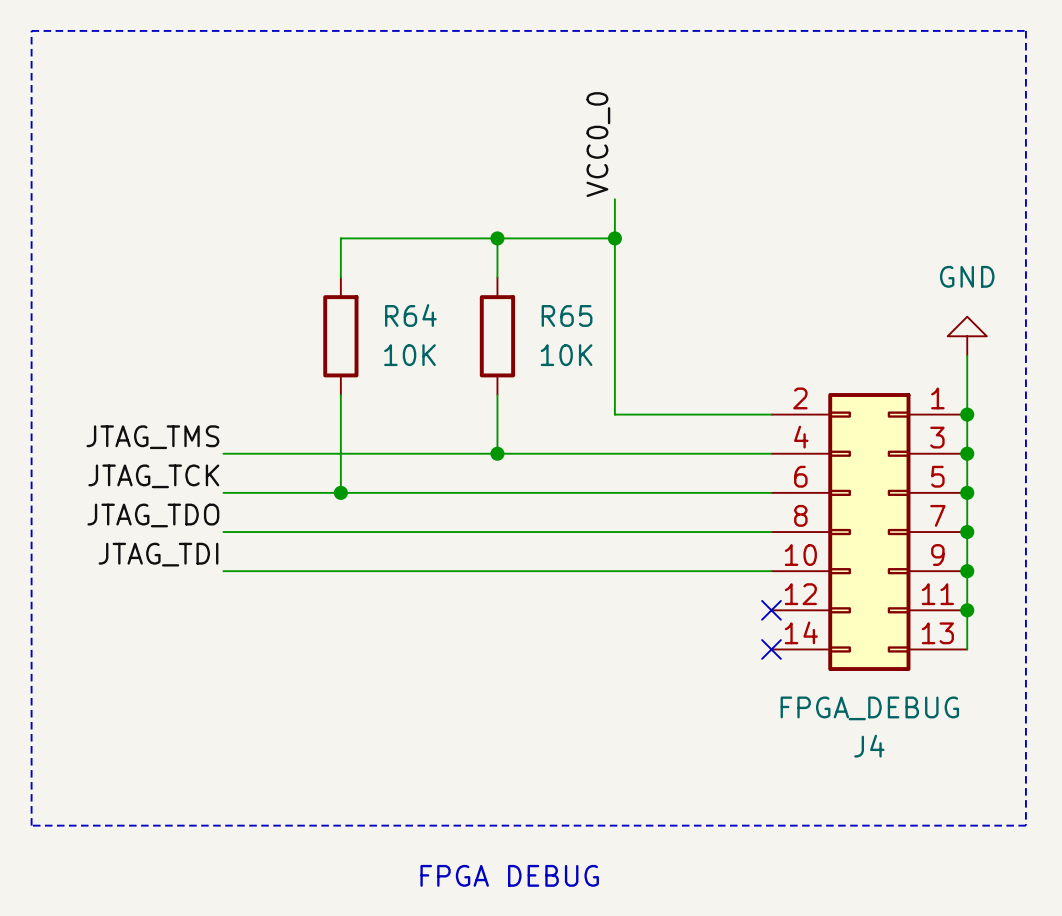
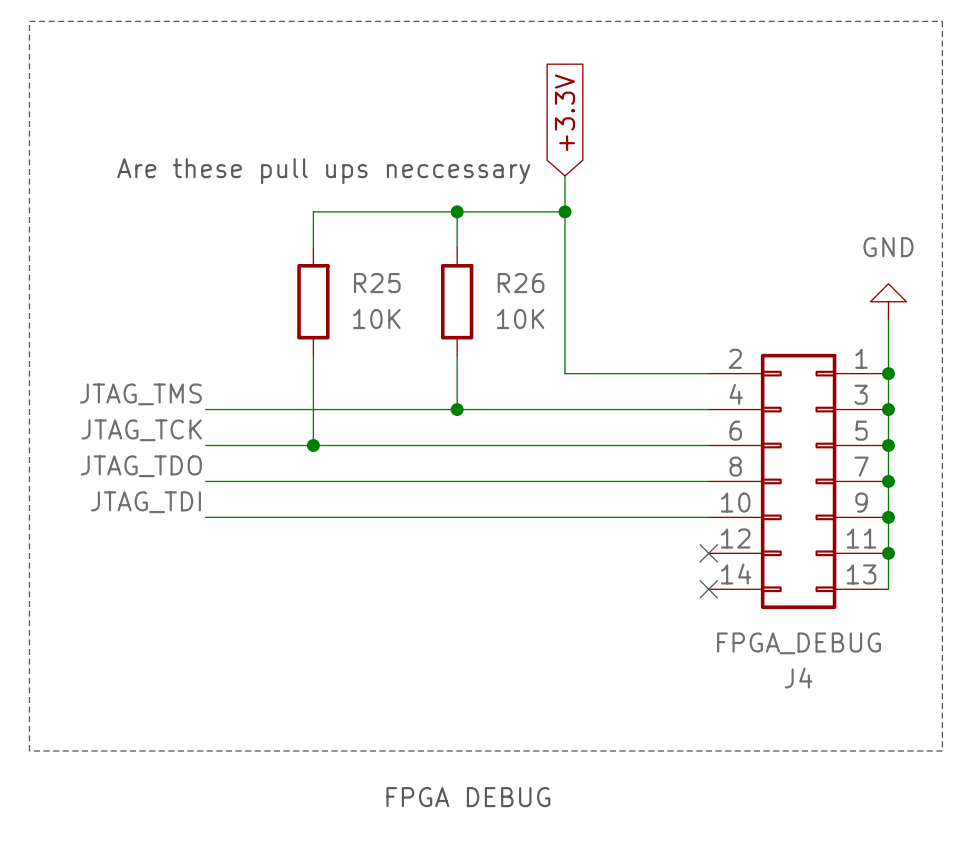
global label: none -> +3.3V (564, 112)
label: VCC0_0 (598, 144) -> none
text: none -> Are these pull ups neccessary (323, 171)
R64 name: R64 (410, 315) -> R25 (377, 283)
R65 name: R65 (567, 315) -> R26 (521, 283)

